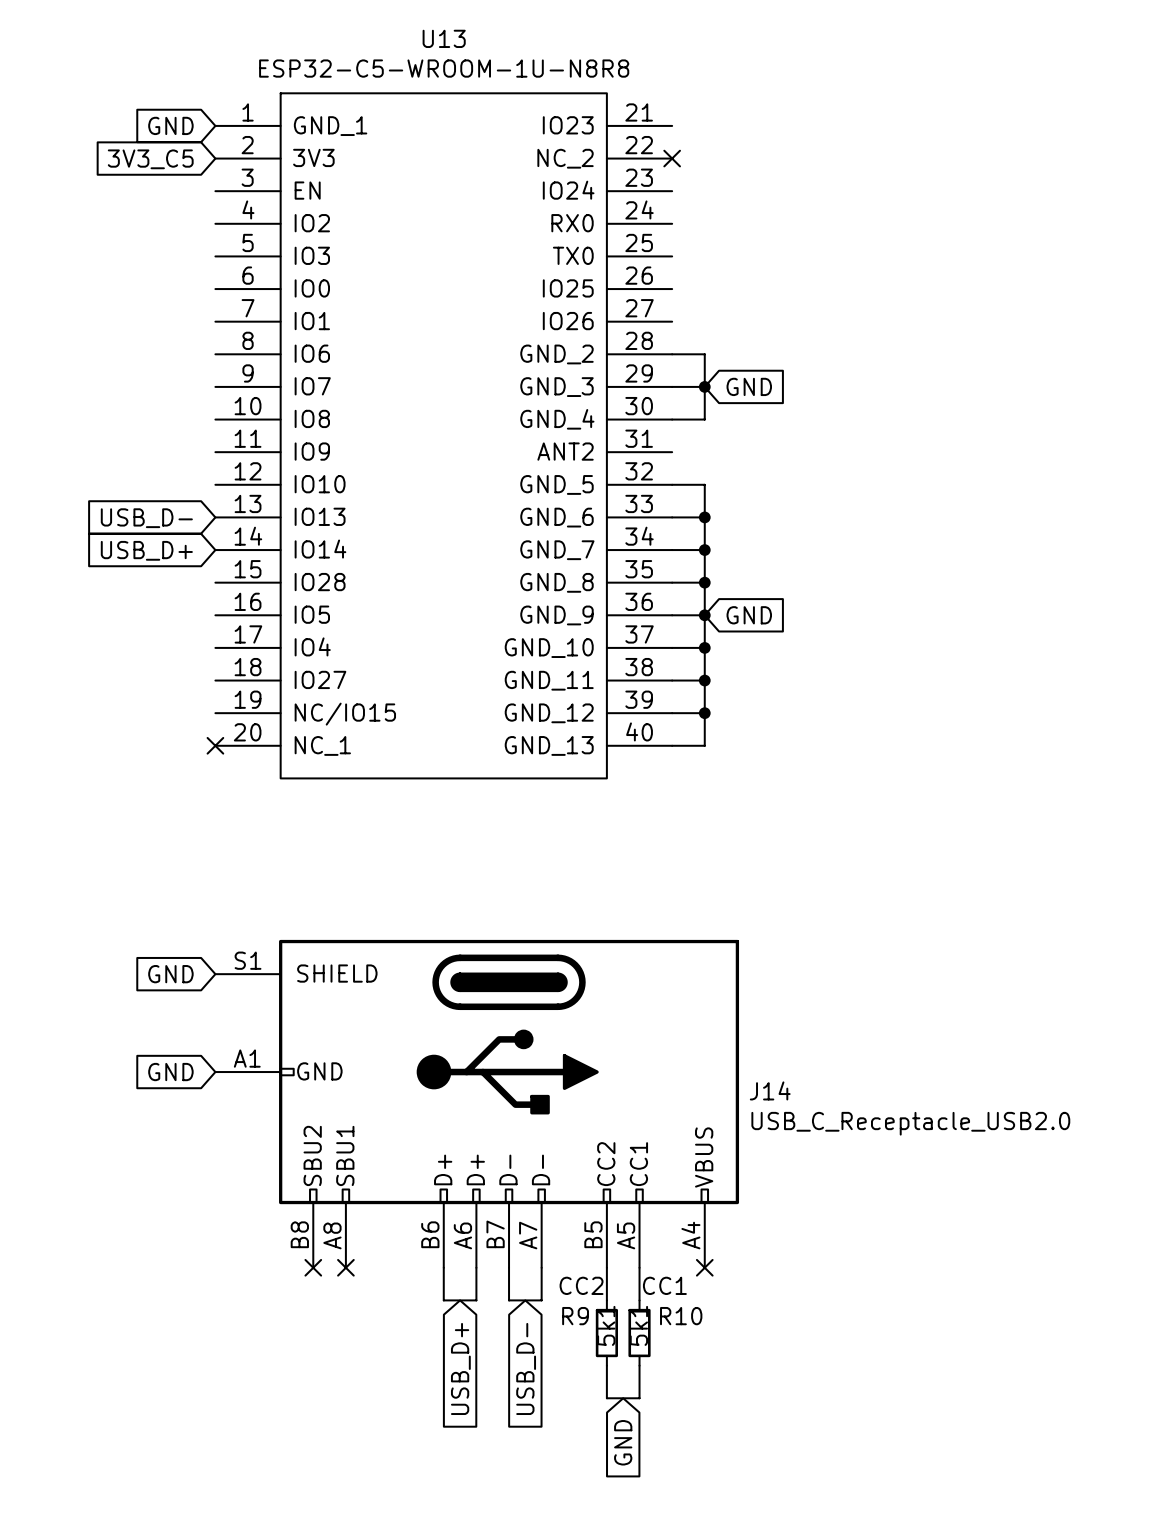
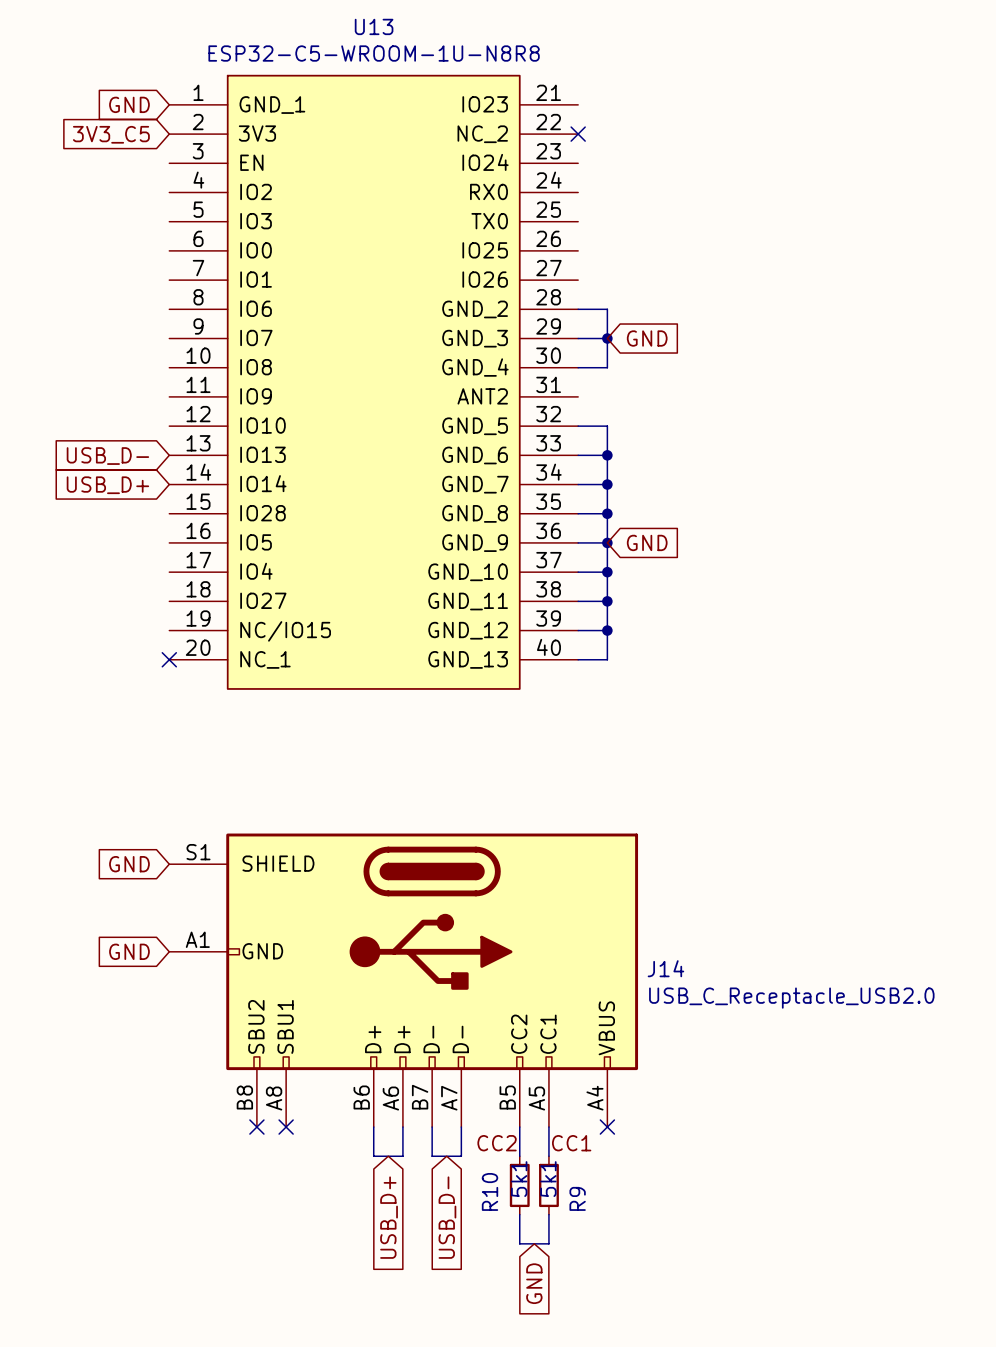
R9 name: R9 (575, 1316) -> R10 (490, 1191)
R10 name: R10 (681, 1316) -> R9 (577, 1198)

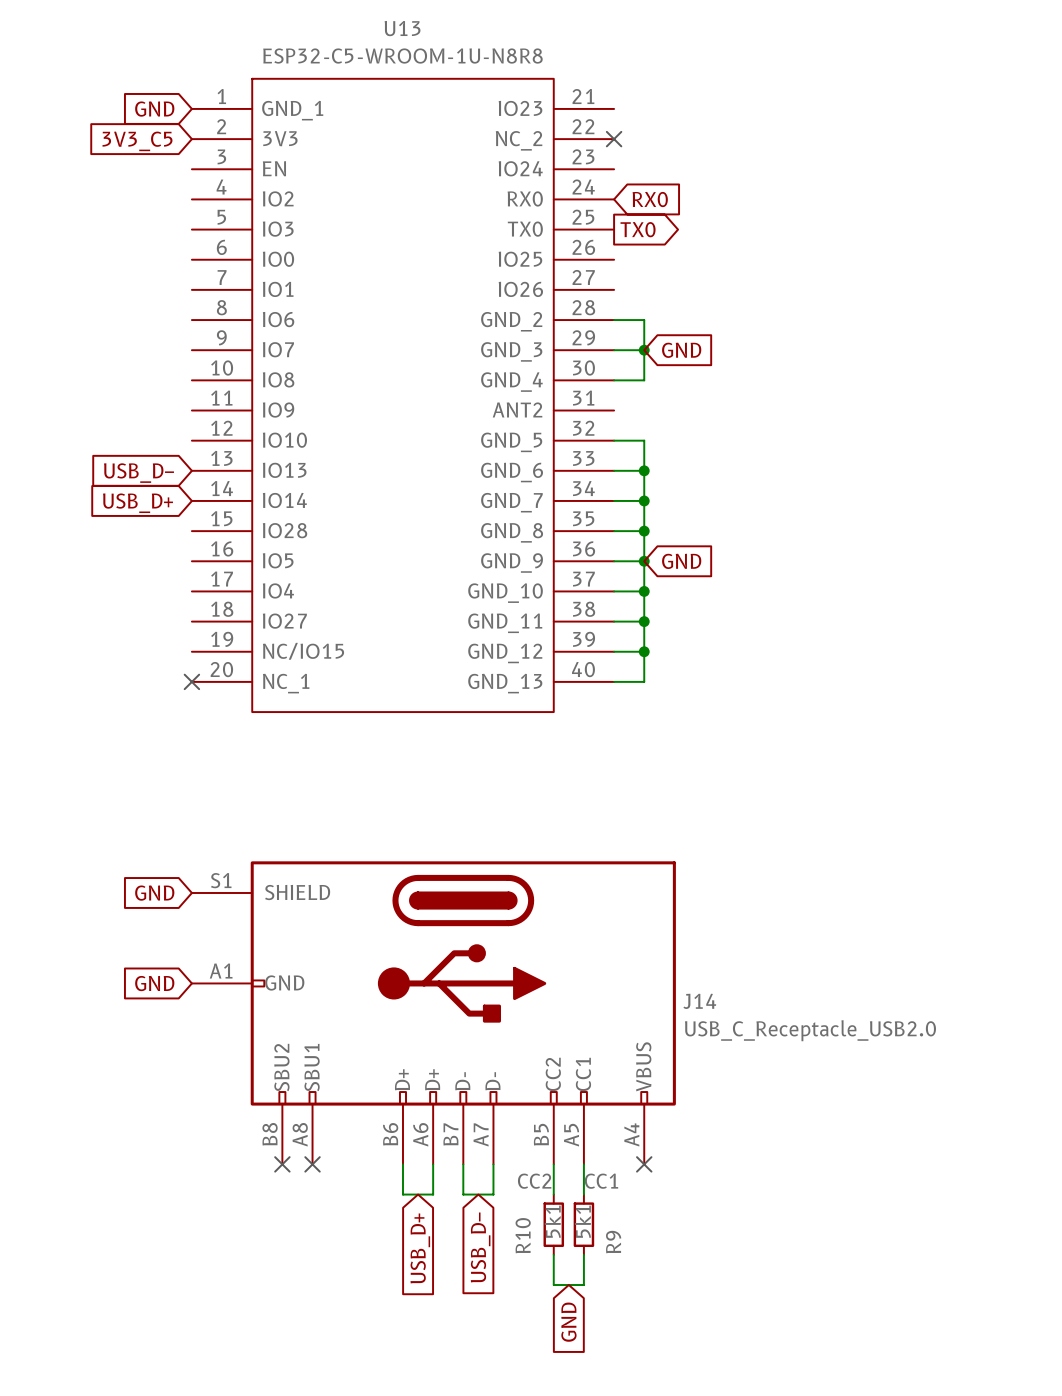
global label: none -> RX0 (650, 199)
global label: none -> TX0 (638, 229)

